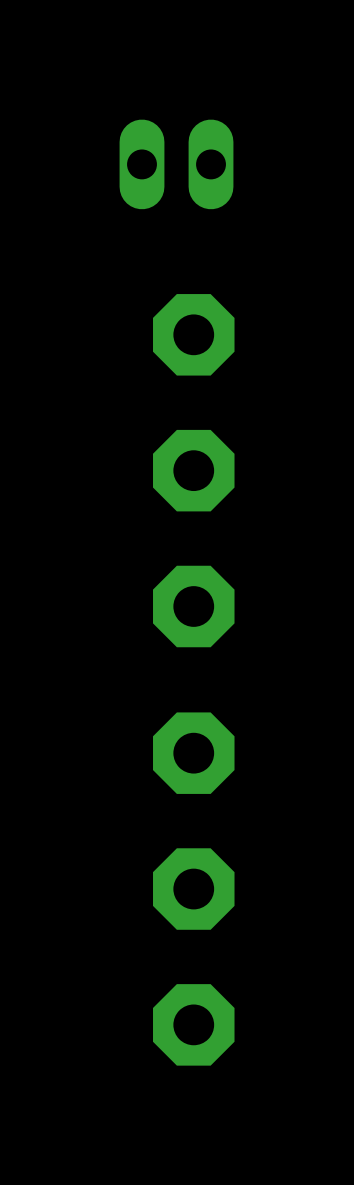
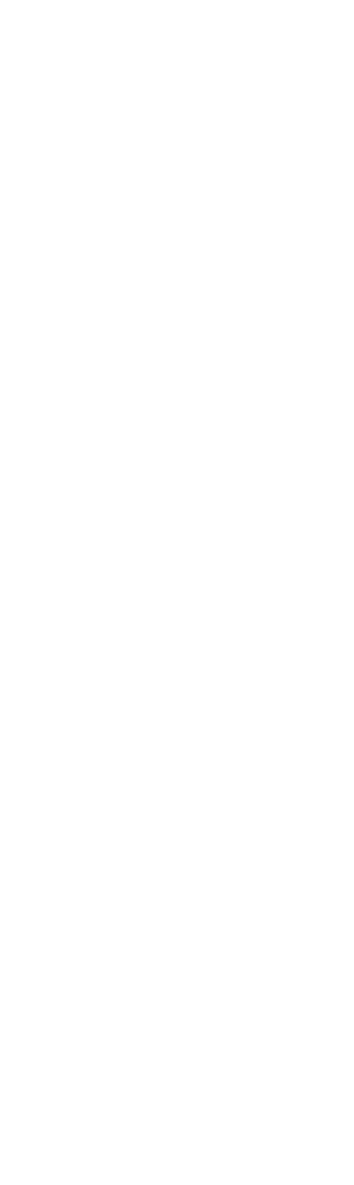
part: (176, 164) -> none
part: (193, 470) -> none
part: (193, 889) -> none

